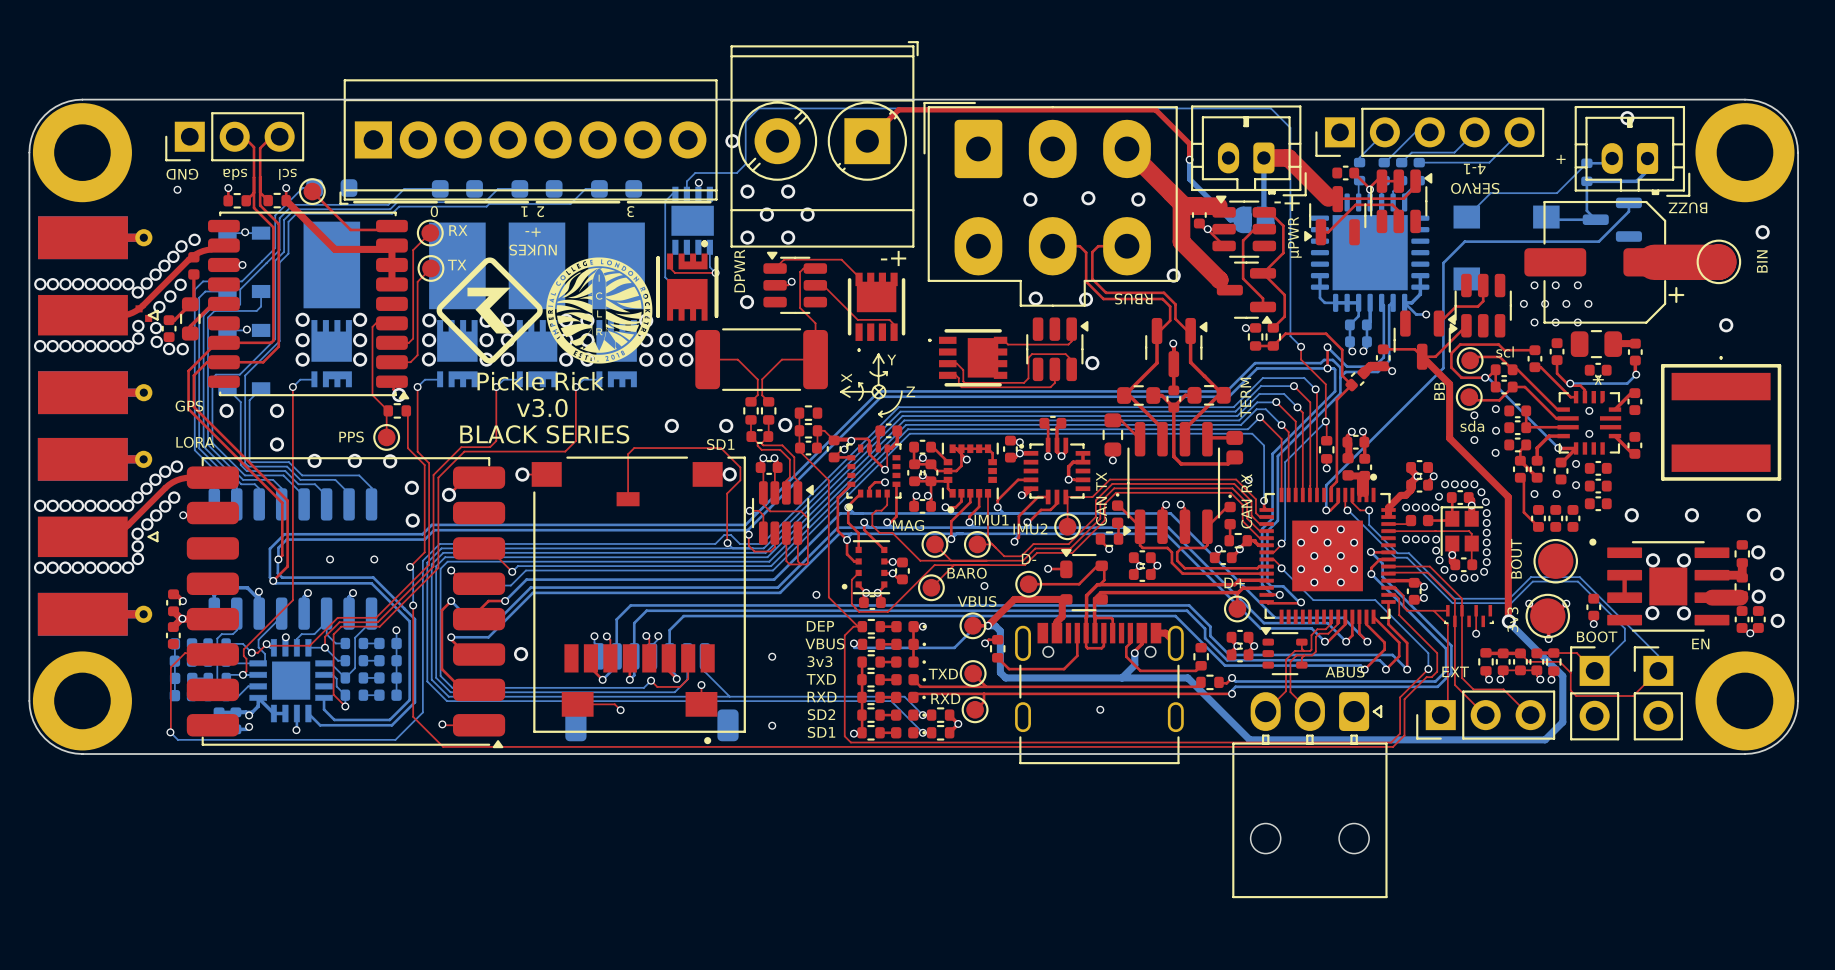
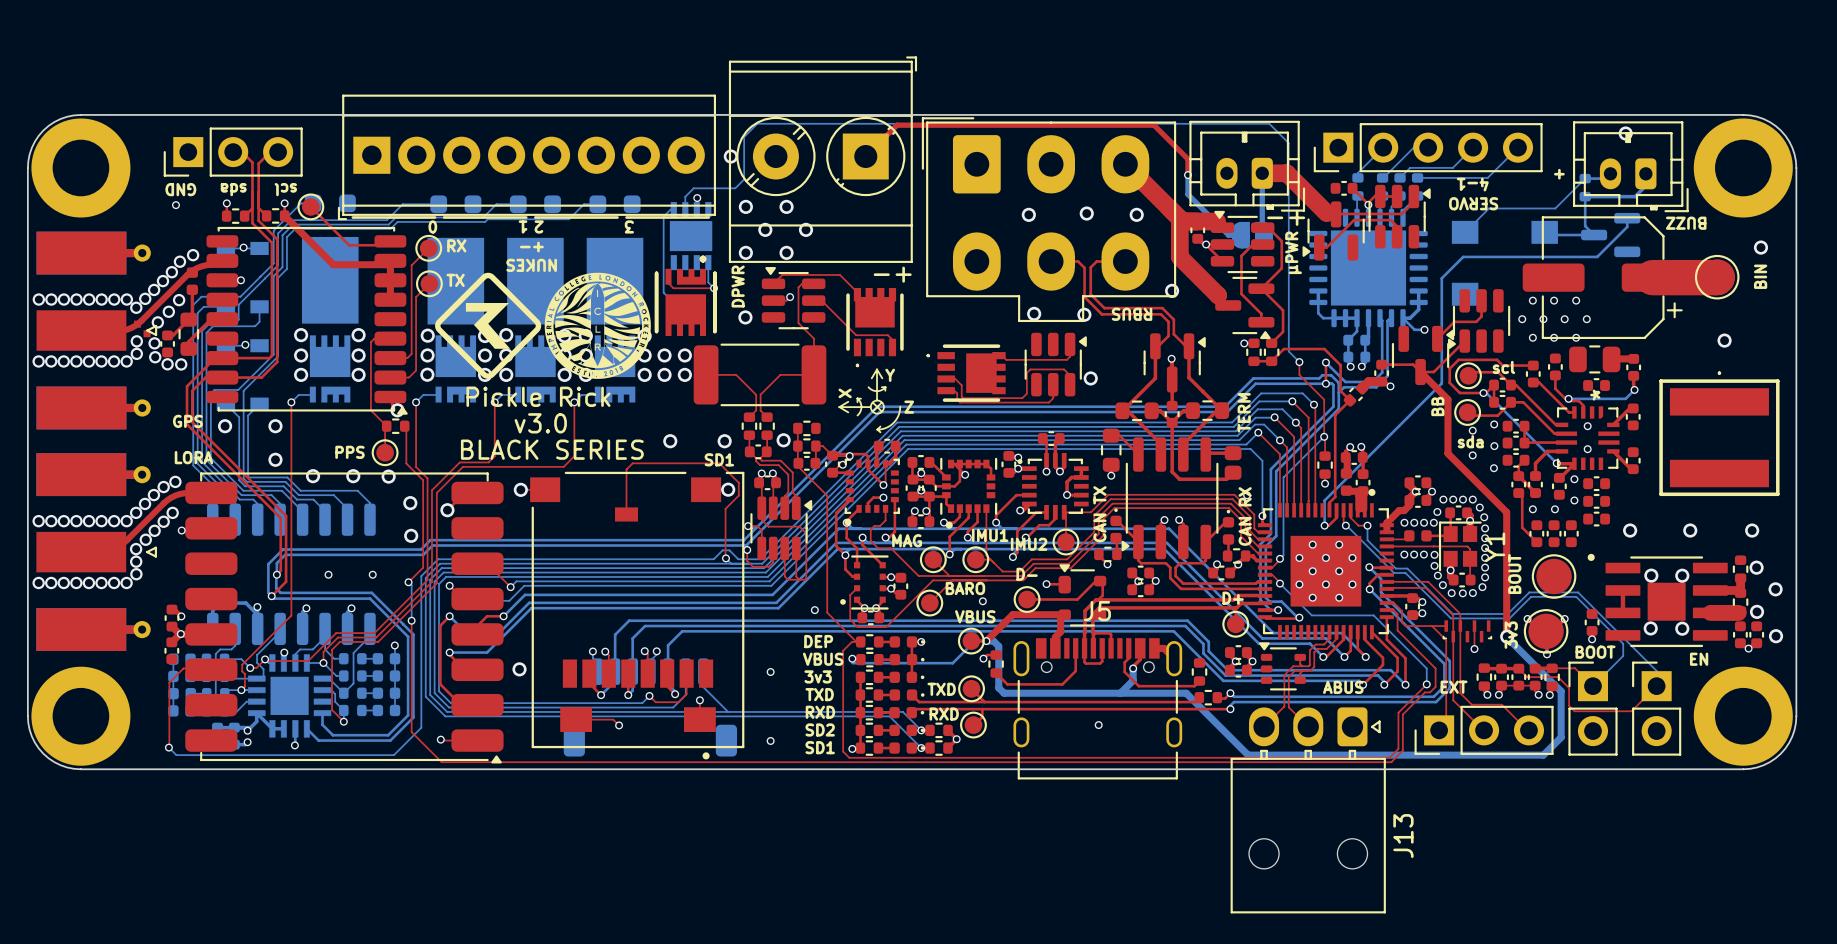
Y1 name: none -> Y1 (1495, 547)
J5 name: none -> J5 (1097, 611)
J13 name: none -> J13 (1403, 836)

